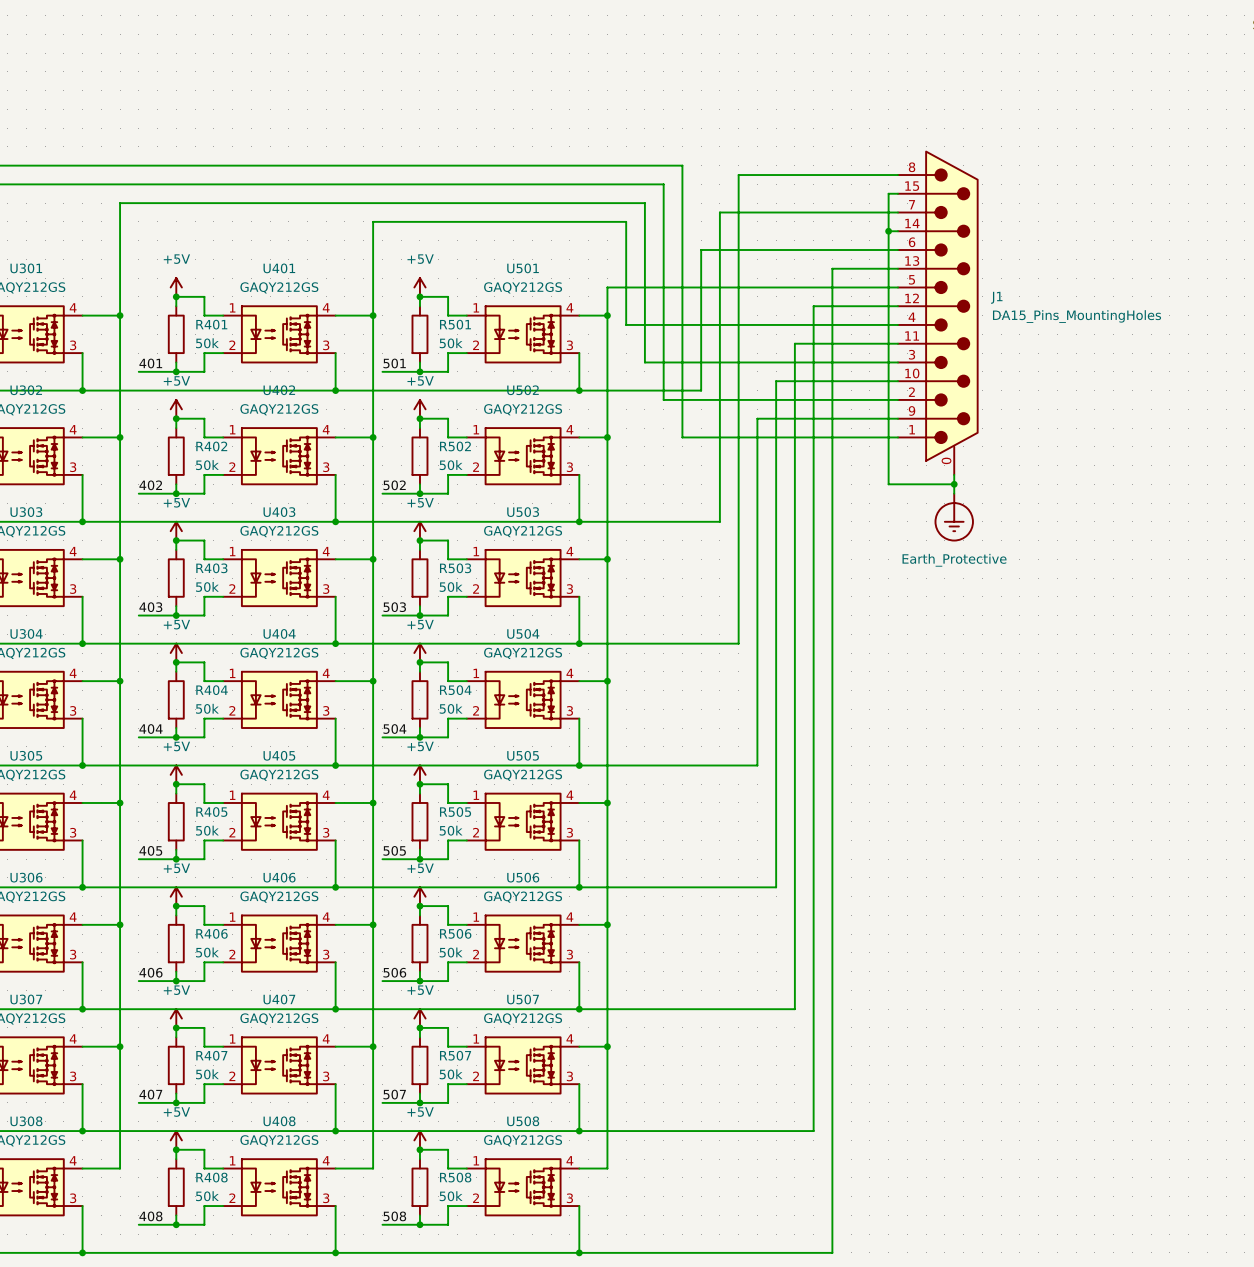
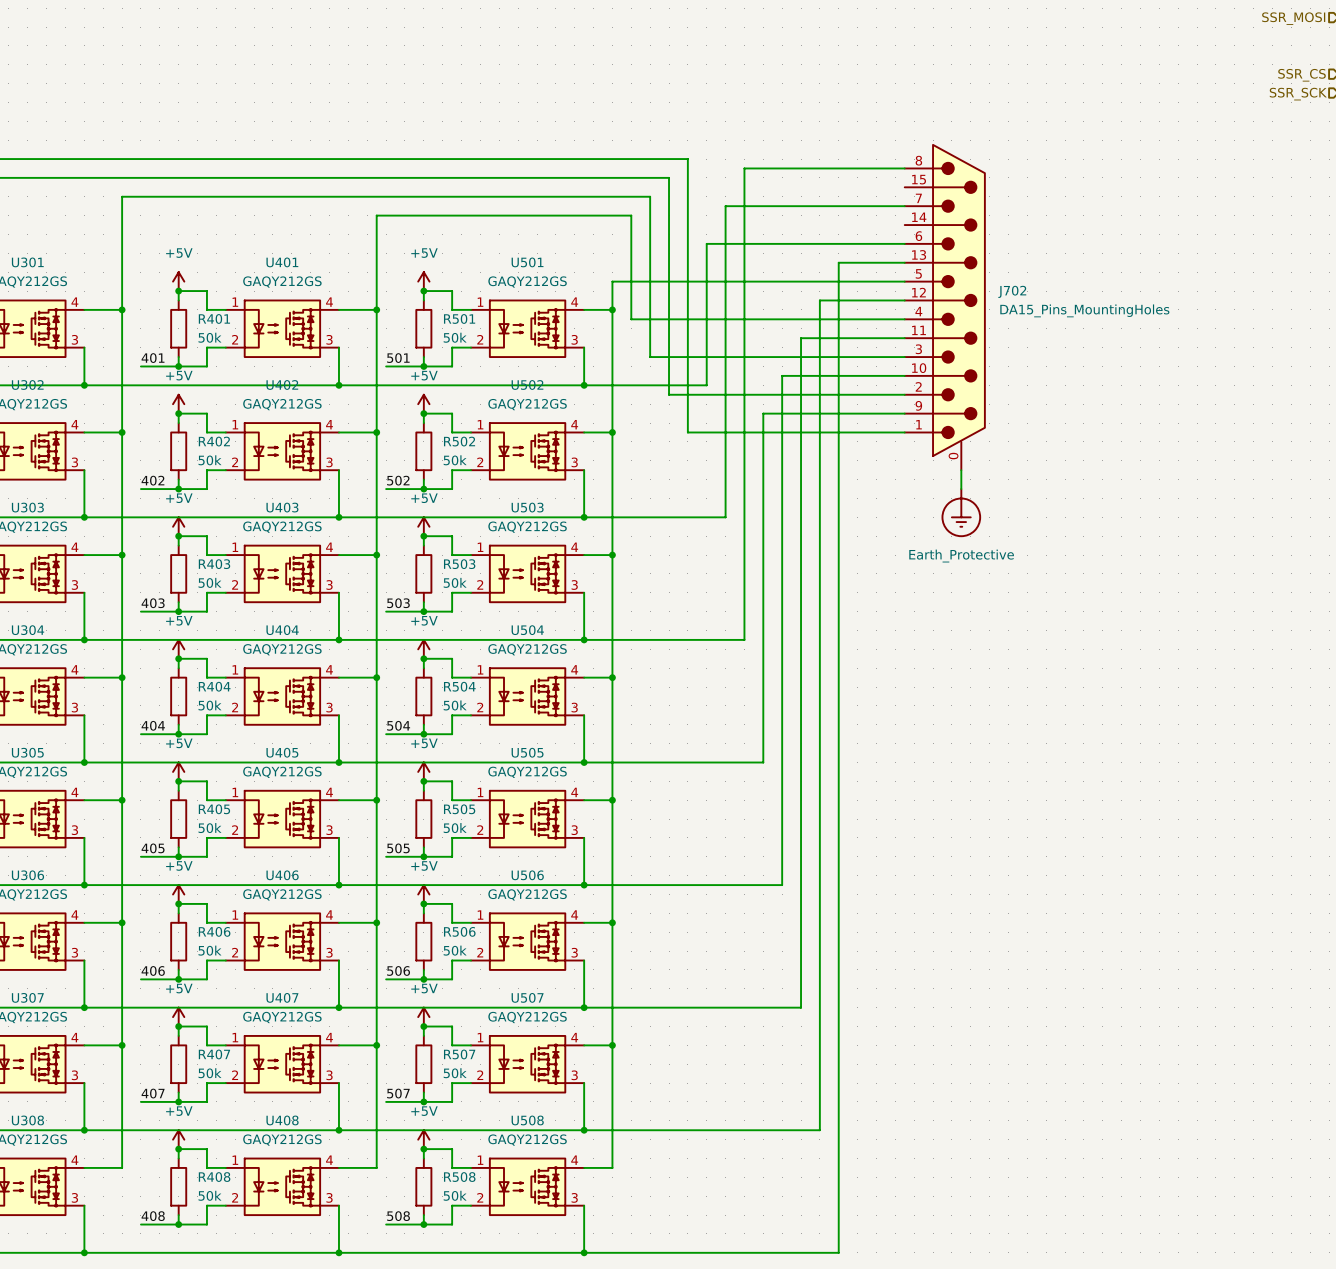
wire: (897, 193) (888, 193) (888, 484) (954, 484) -> none
wire: (888, 231) (897, 231) -> none
junction: (888, 231) -> none
J1 name: J1 (996, 297) -> J702 (1012, 291)
junction: (954, 484) -> none

